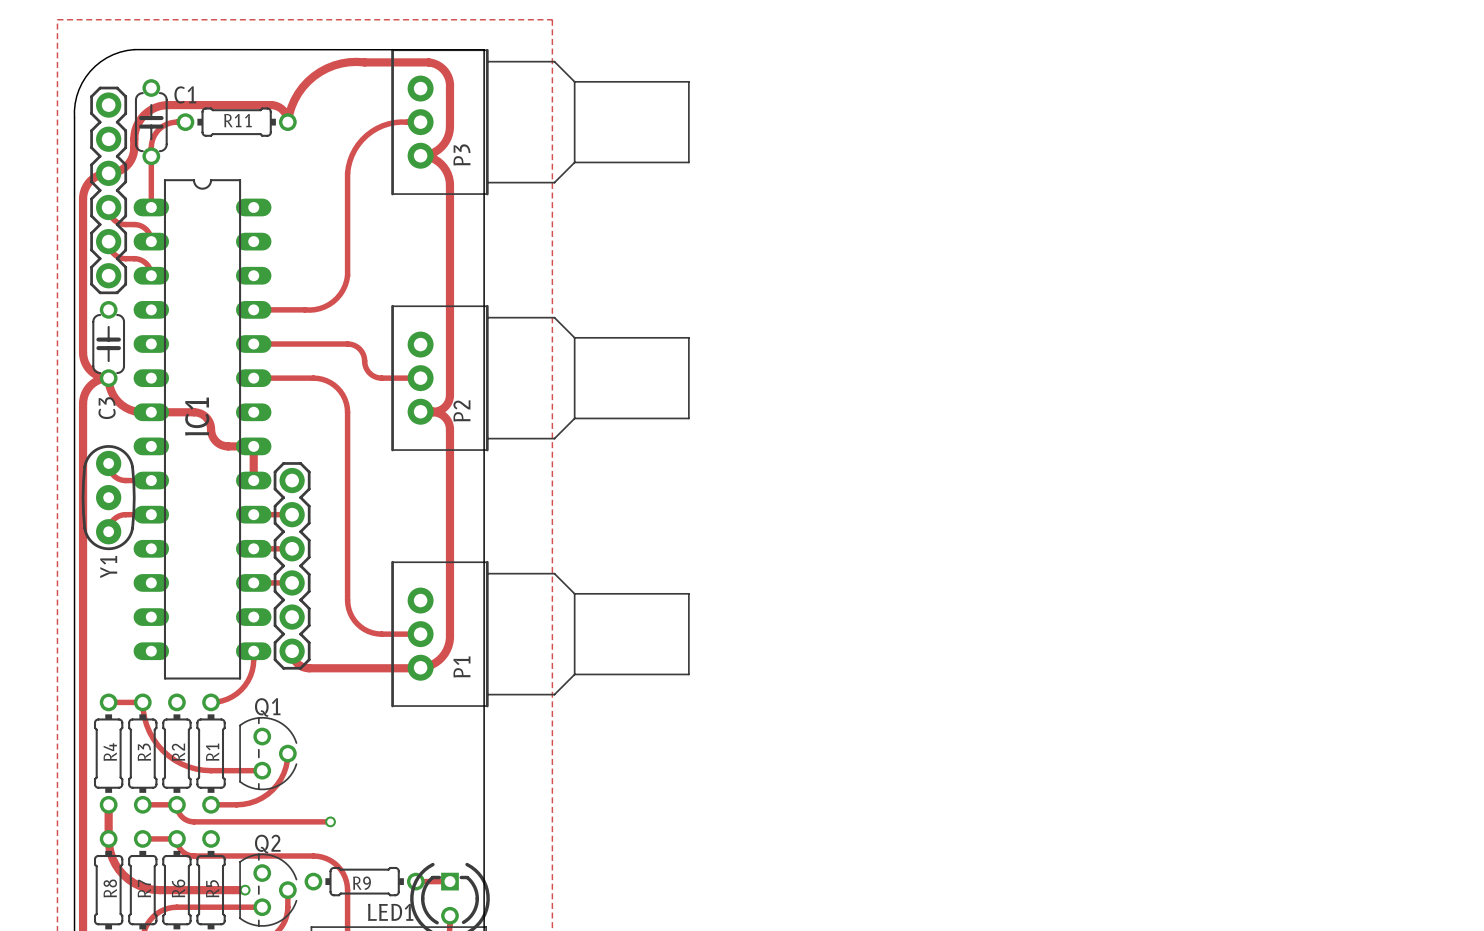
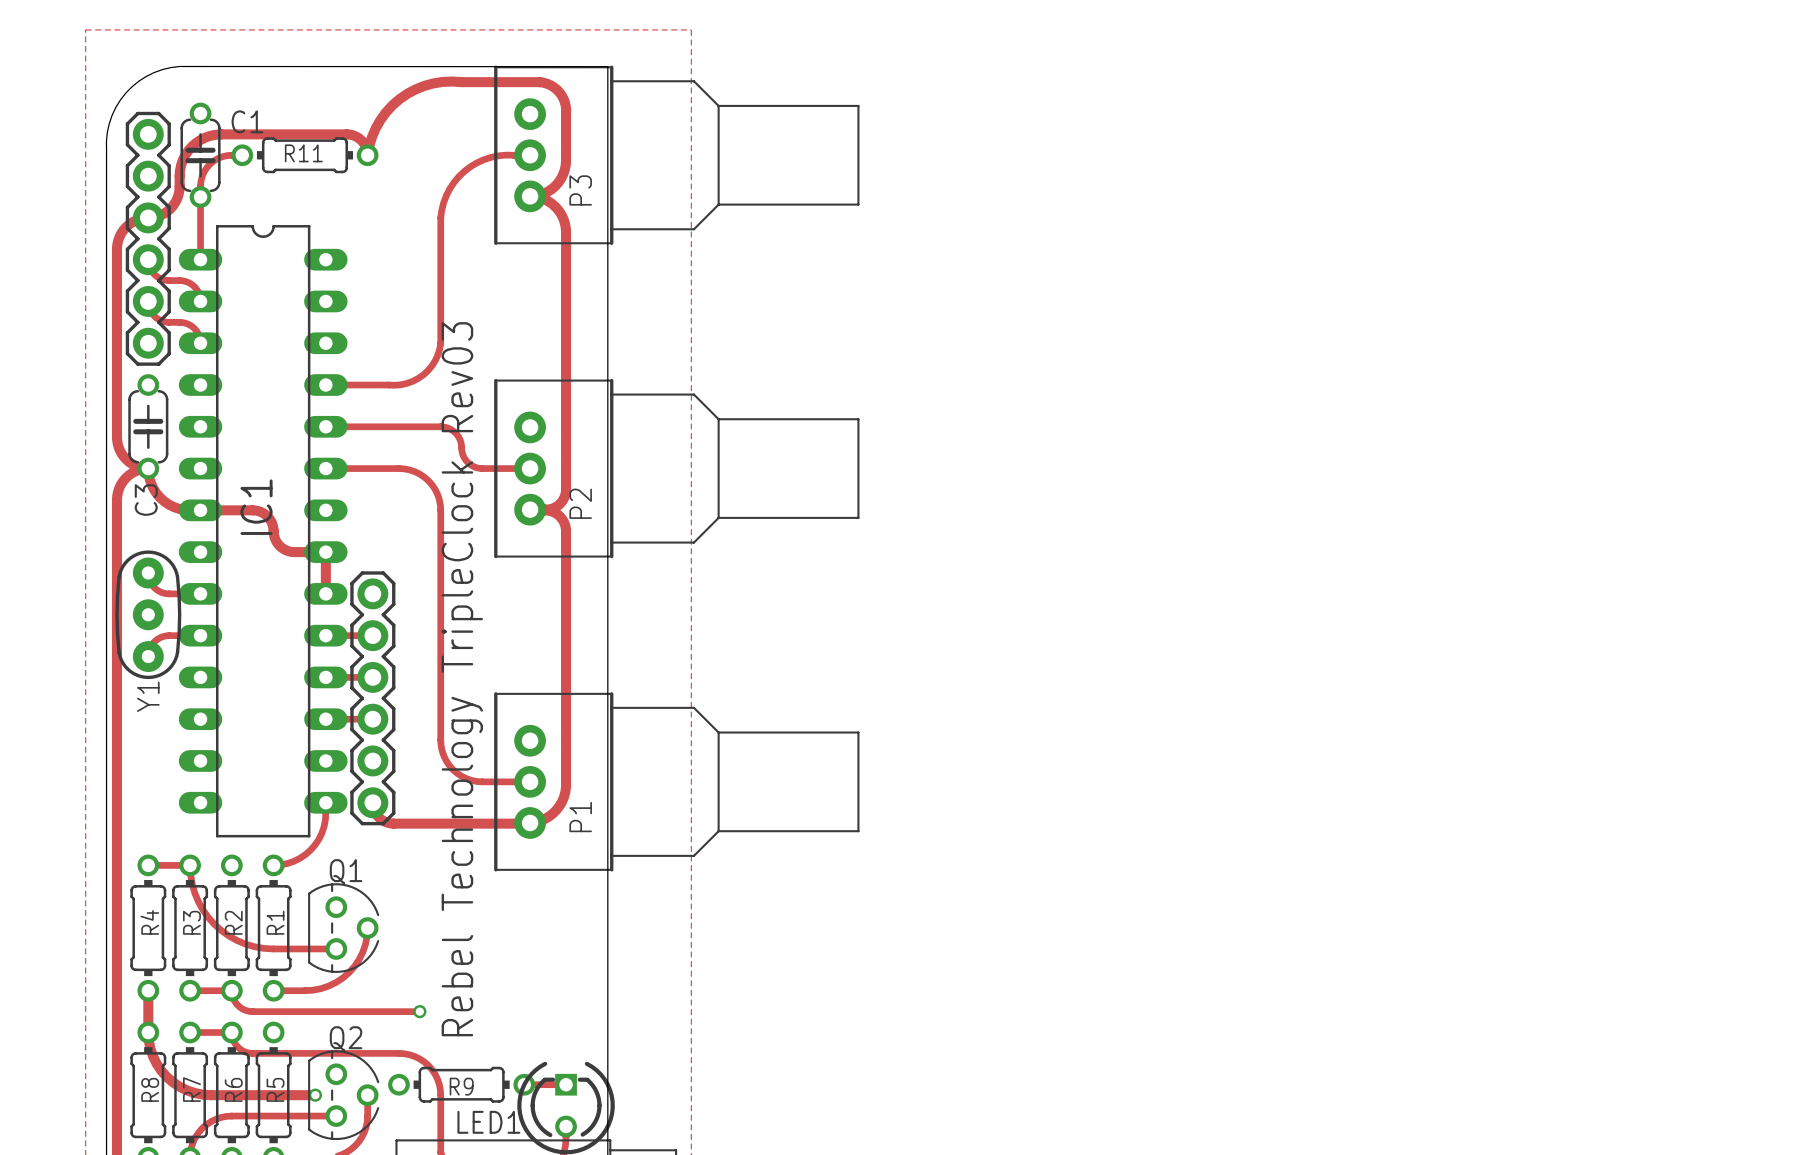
text: none -> Rebel Technology TripleClock Rev03 (462, 679)

